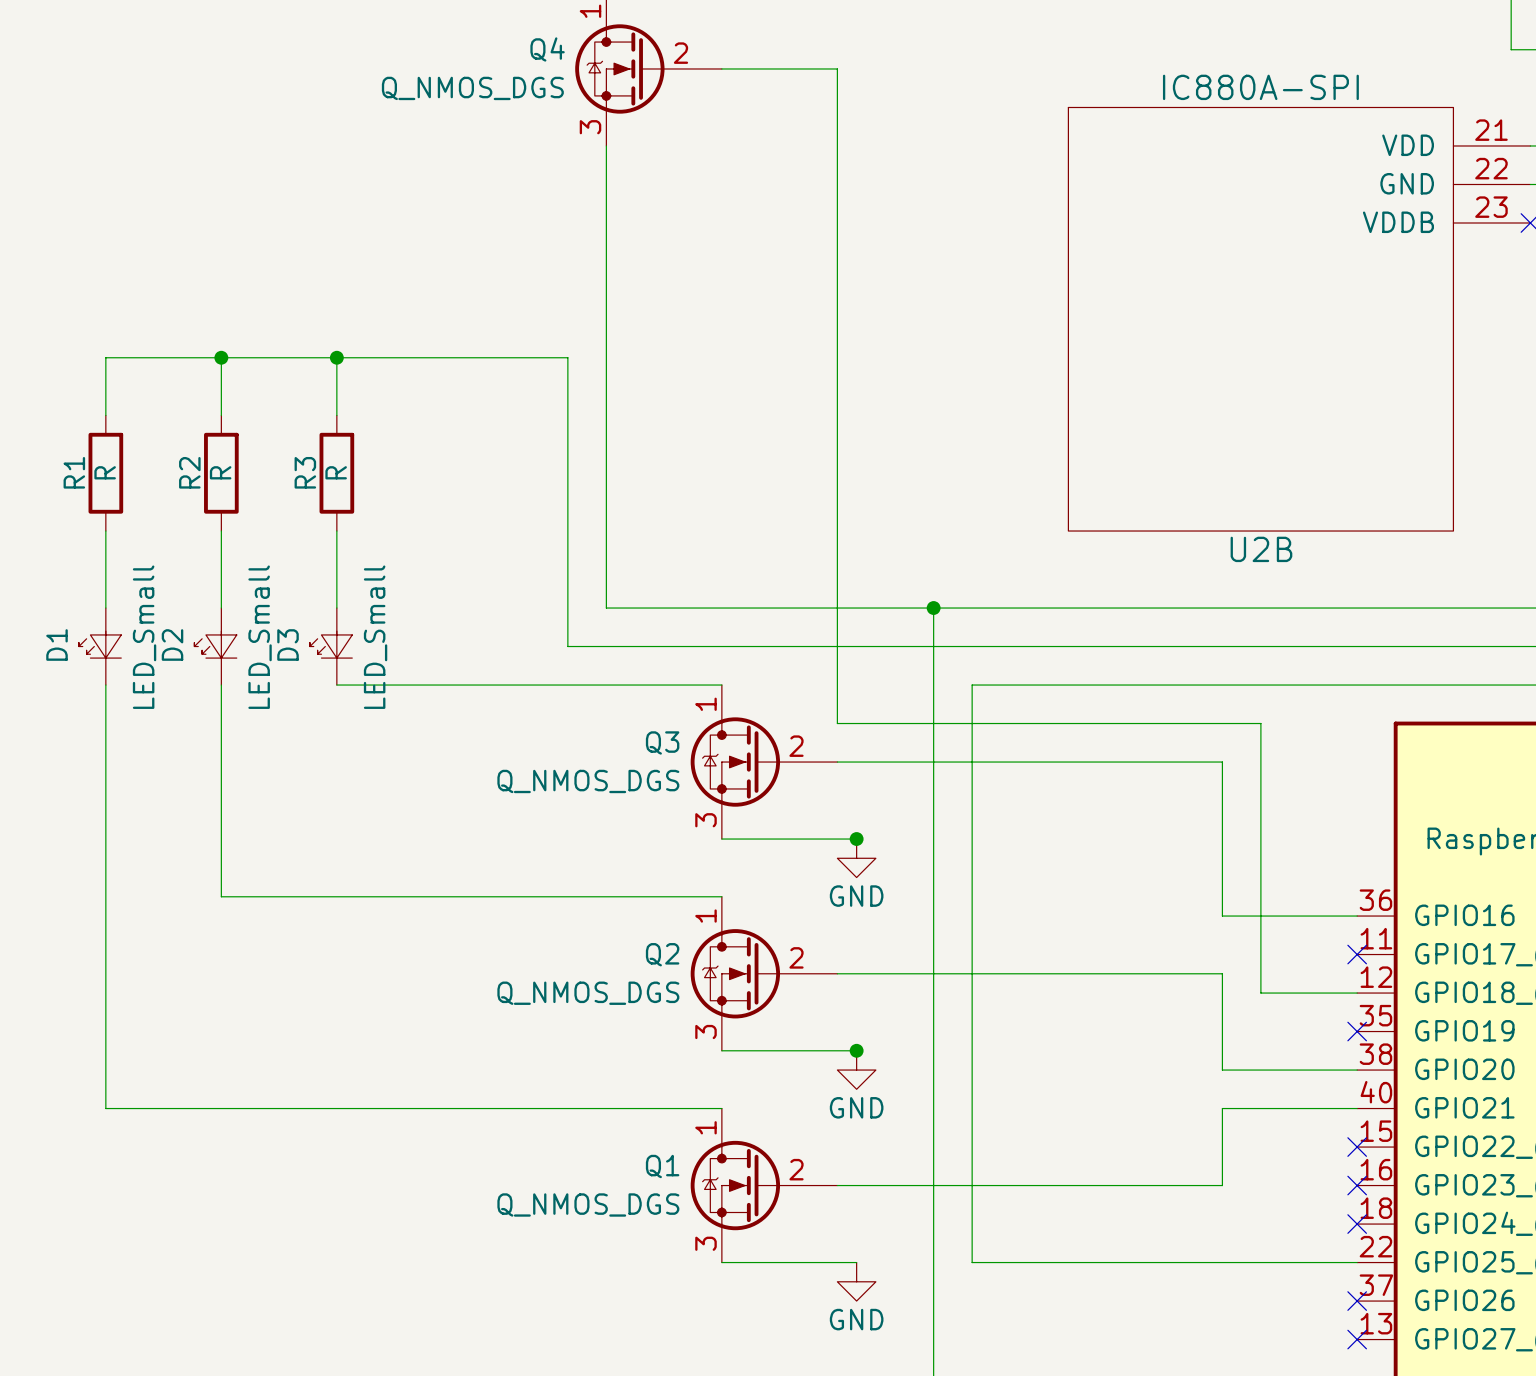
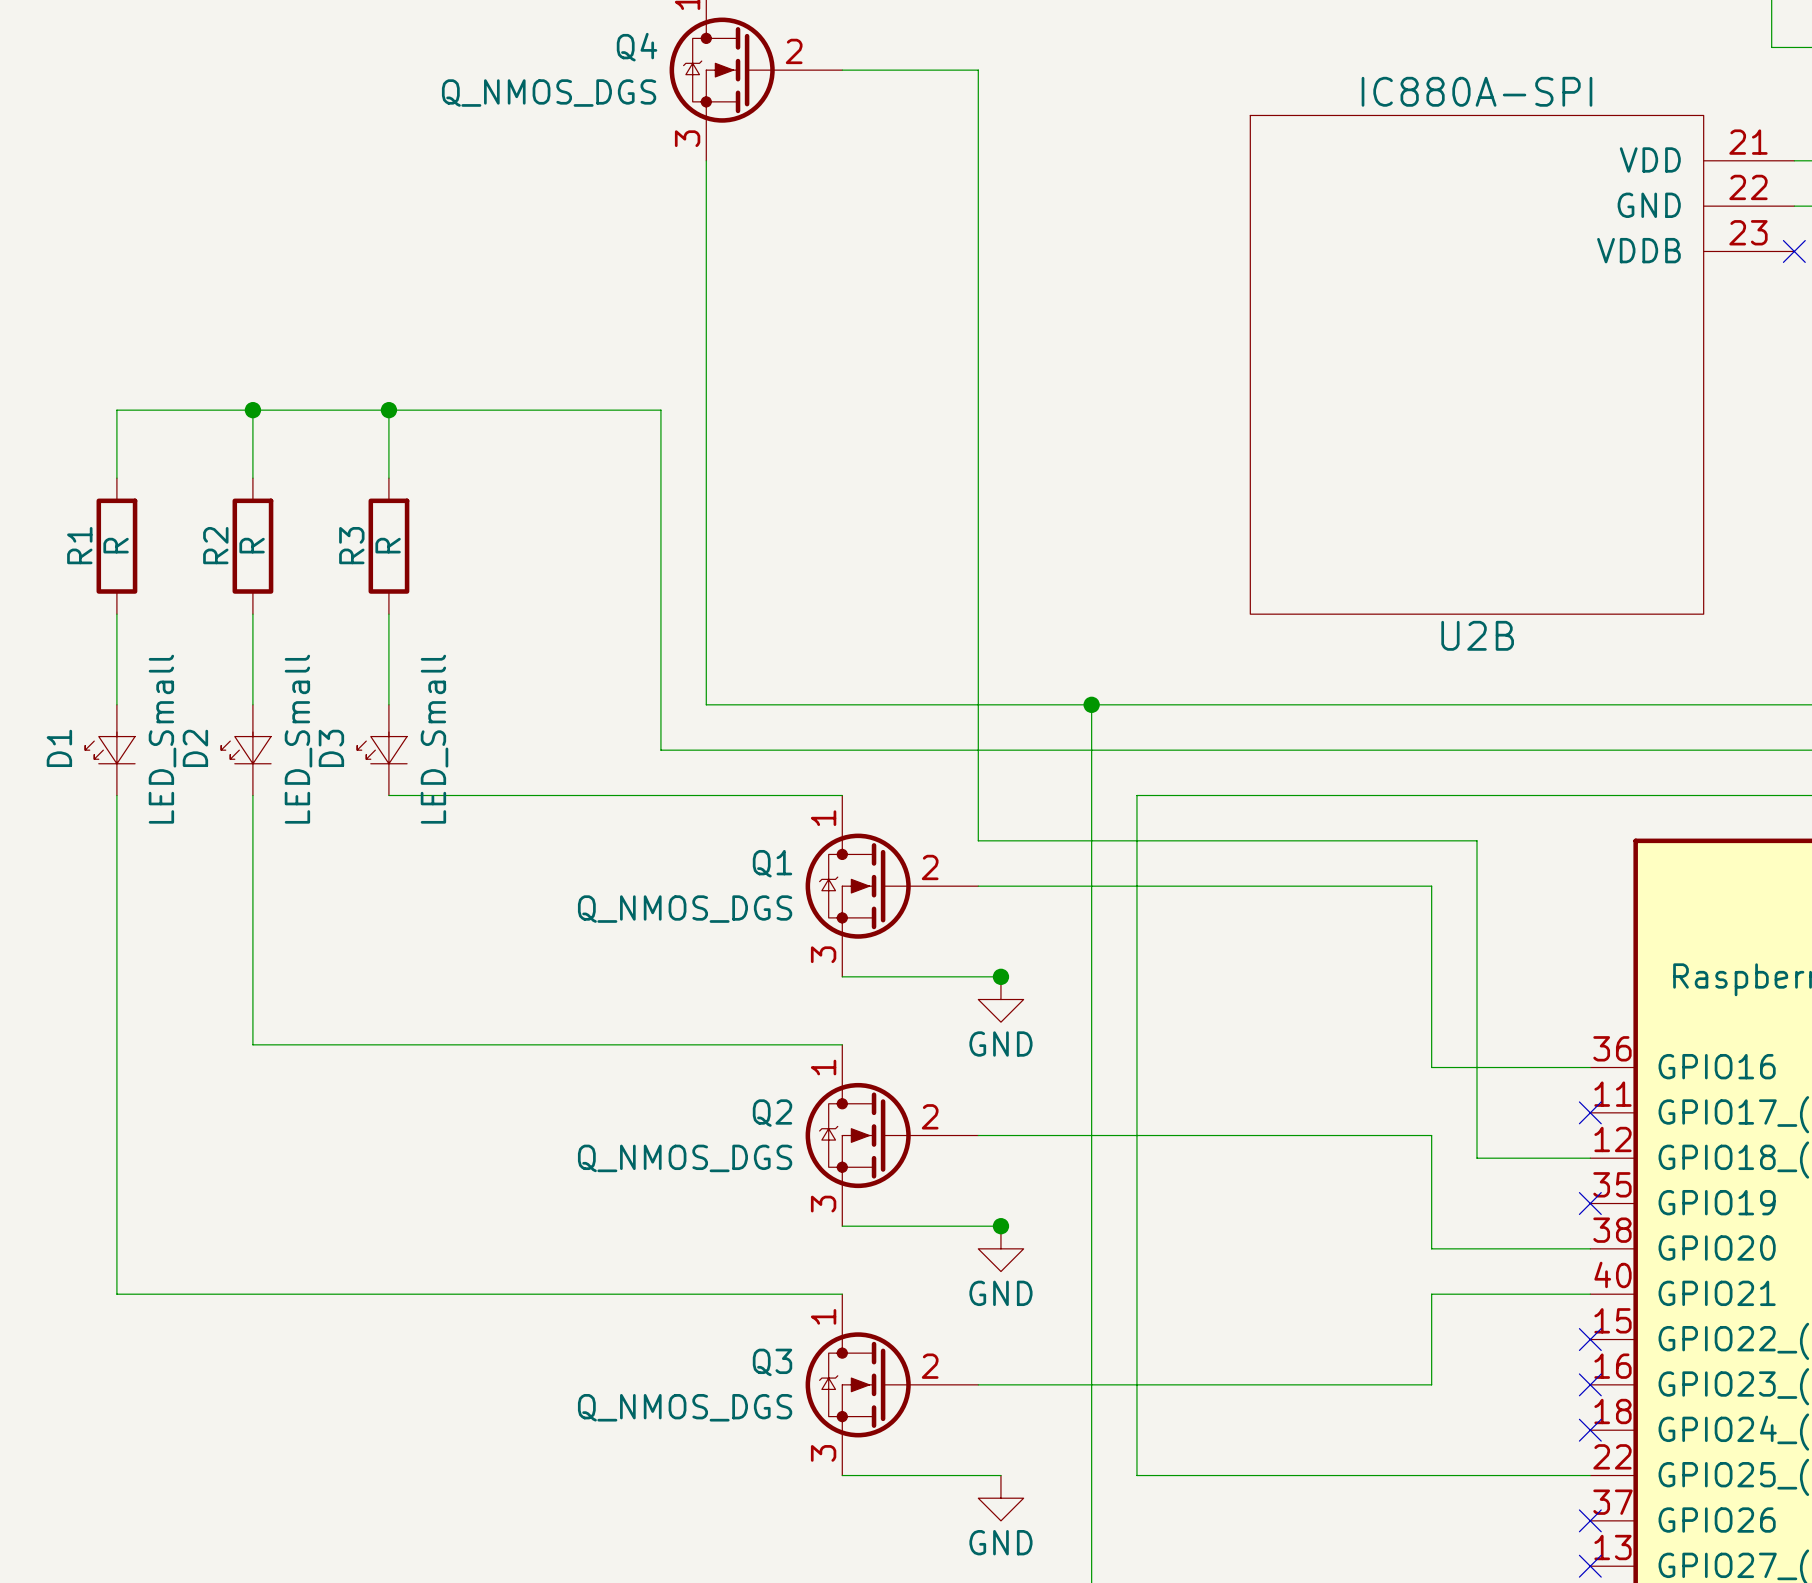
Q3 name: Q3 (662, 742) -> Q1 (772, 863)
Q1 name: Q1 (662, 1166) -> Q3 (772, 1362)

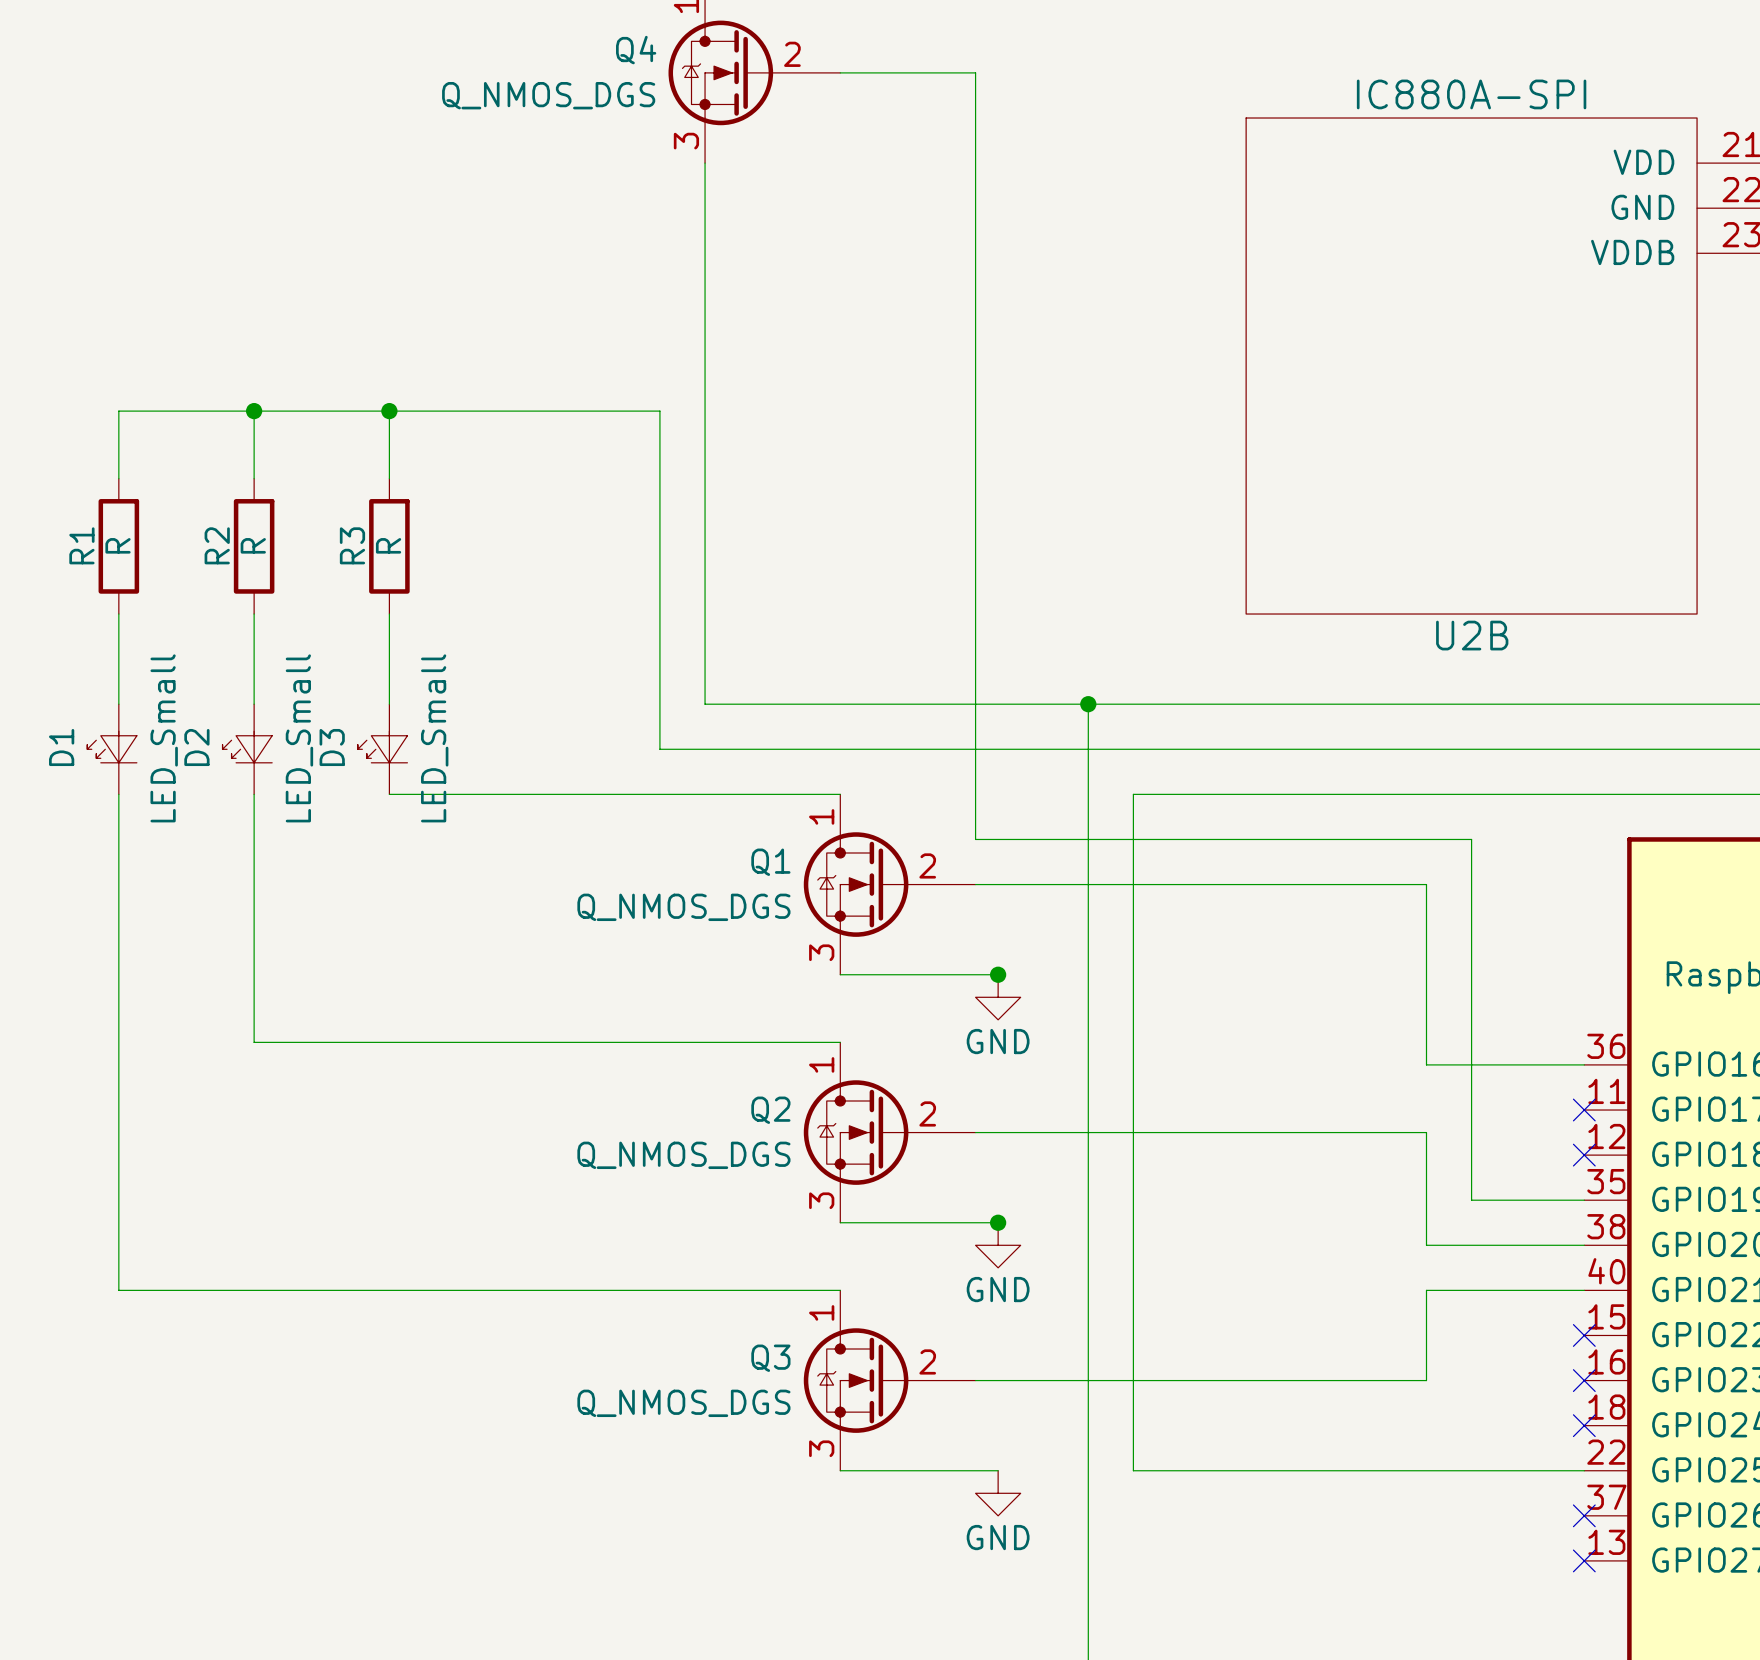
wire: (1476, 1158) (1590, 1158) -> (1471, 1155) (1471, 1200) (1584, 1200)
no-connect mark position: (1590, 1203) -> (1584, 1155)

